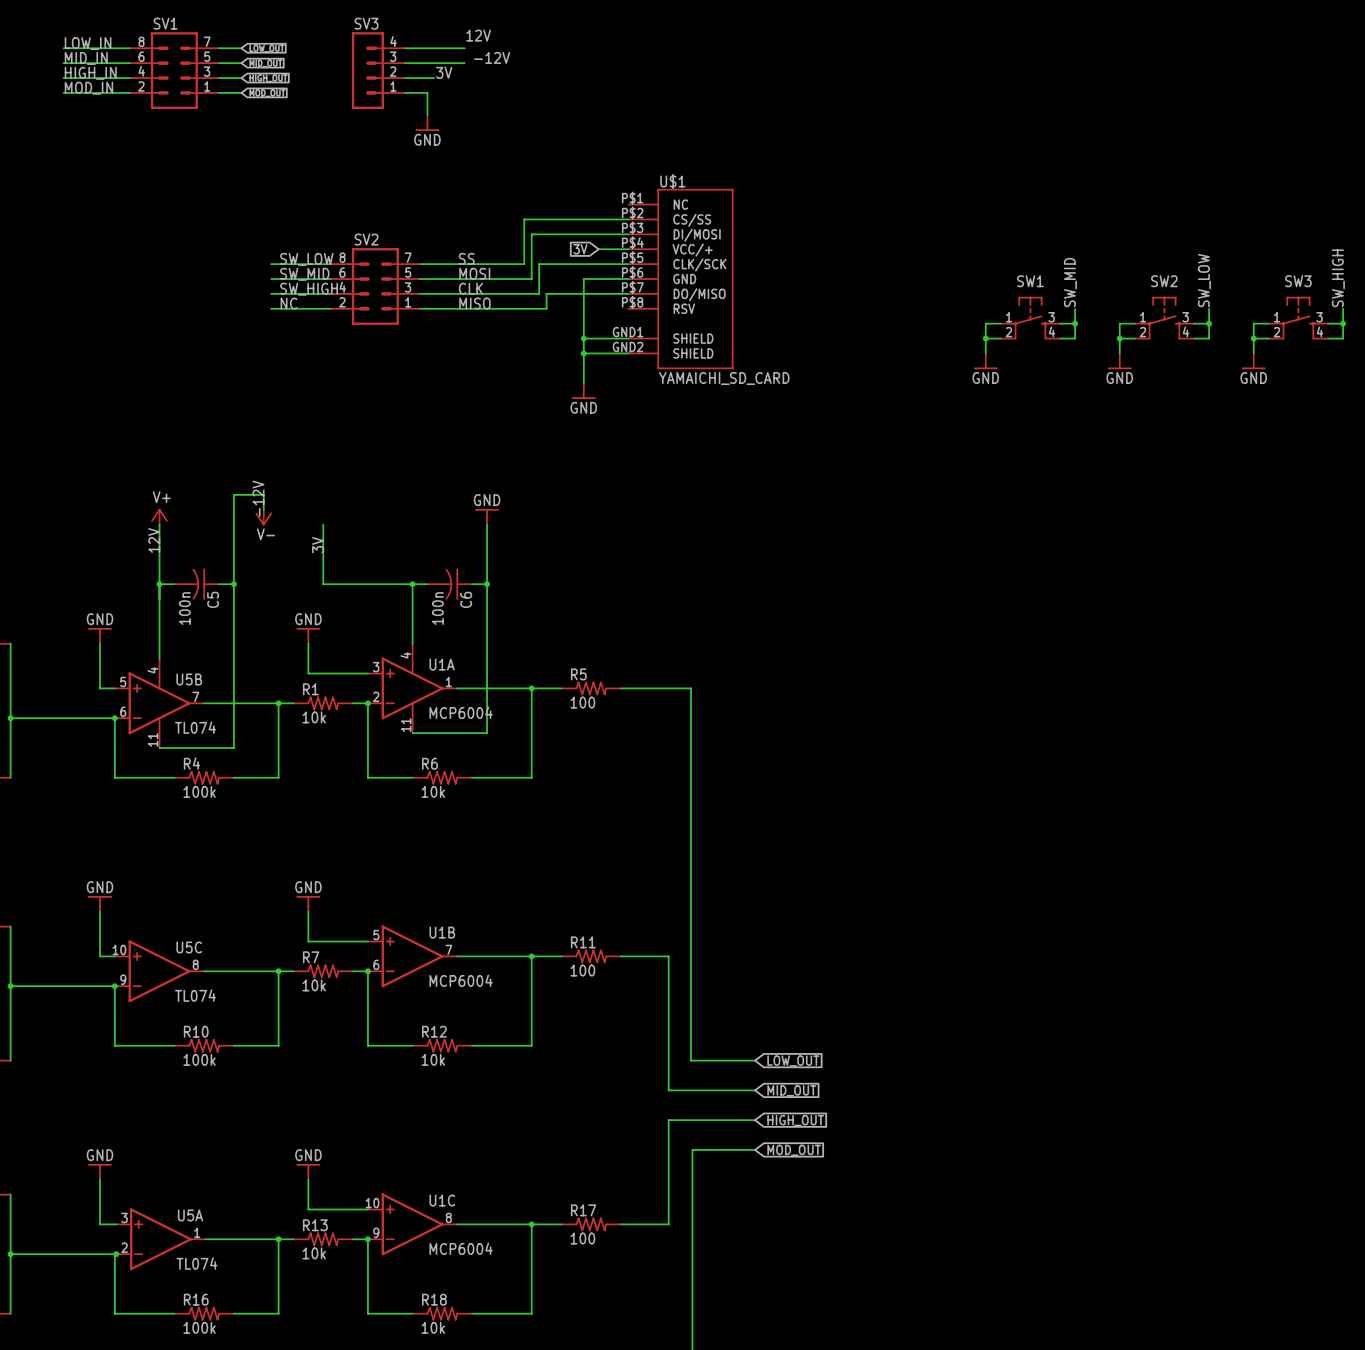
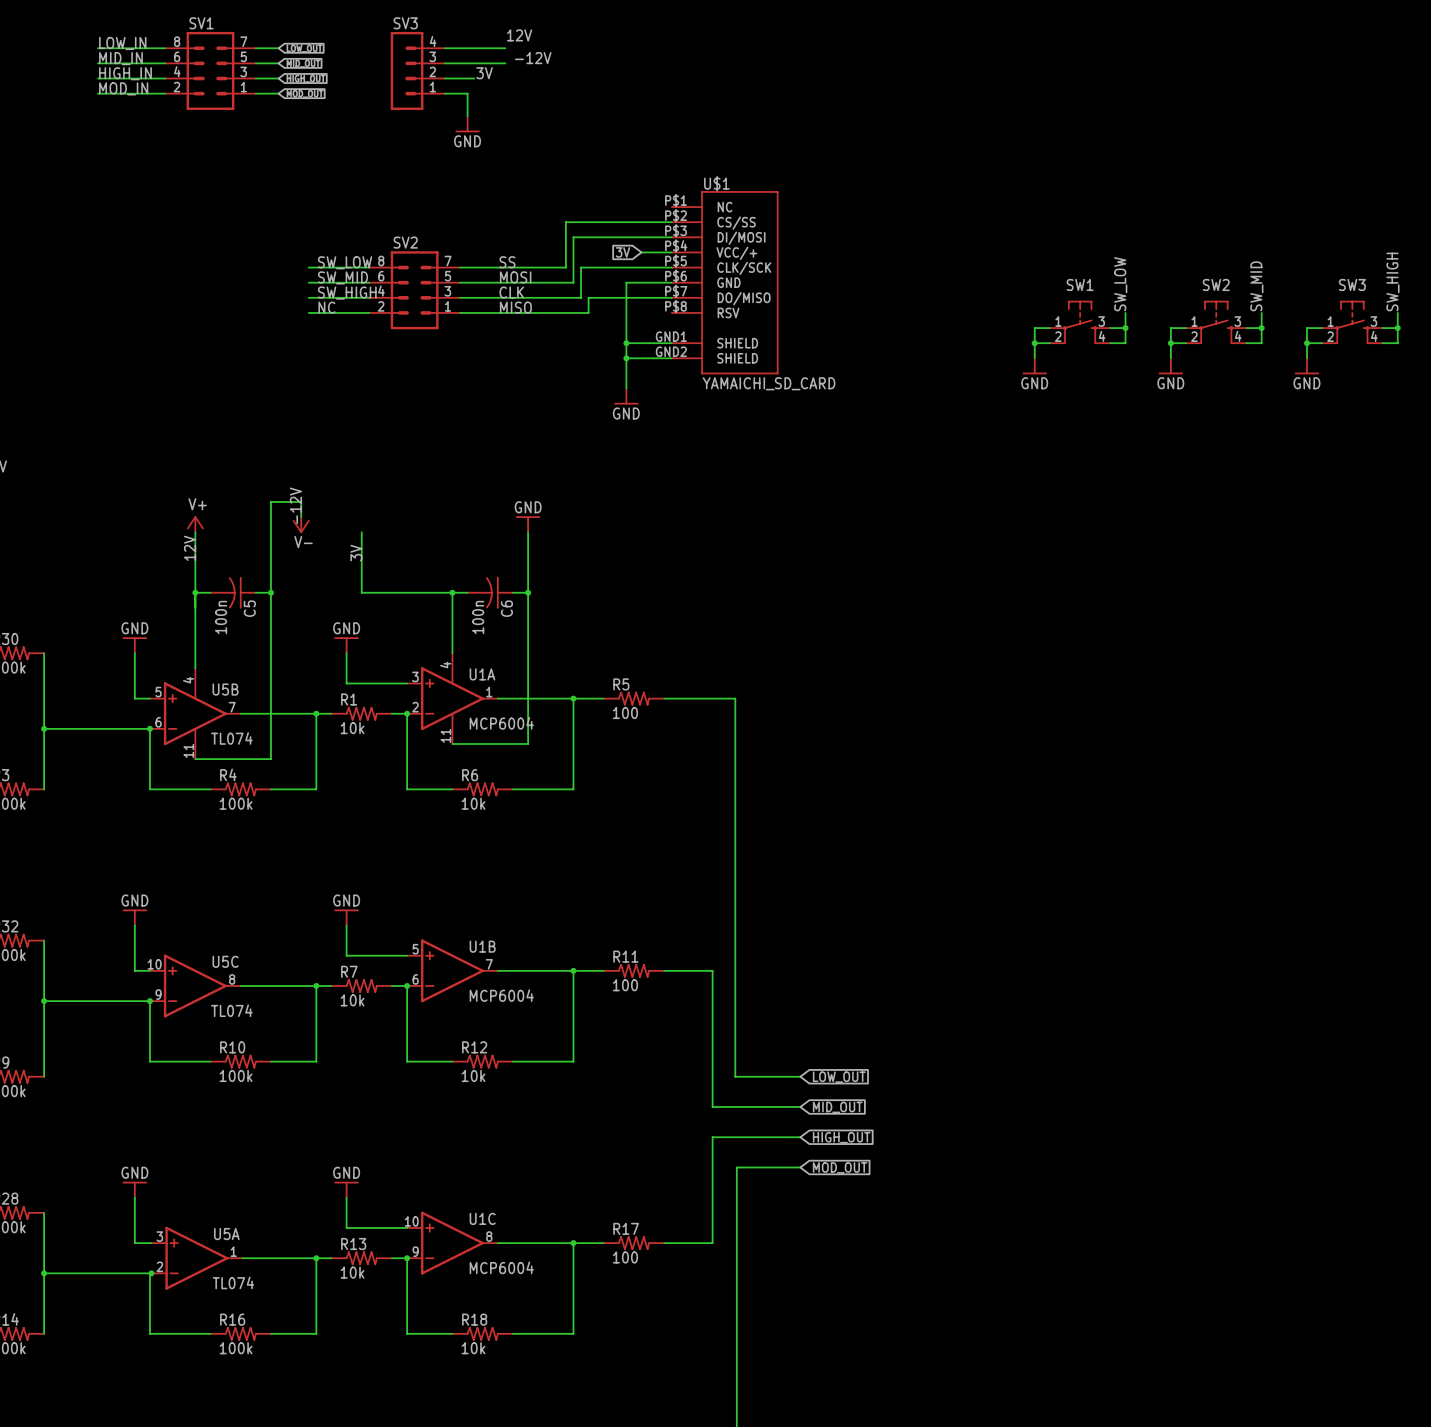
label: SW_LOW (1204, 280) -> SW_MID (1256, 286)
label: SW_MID (1070, 282) -> SW_LOW (1120, 284)

